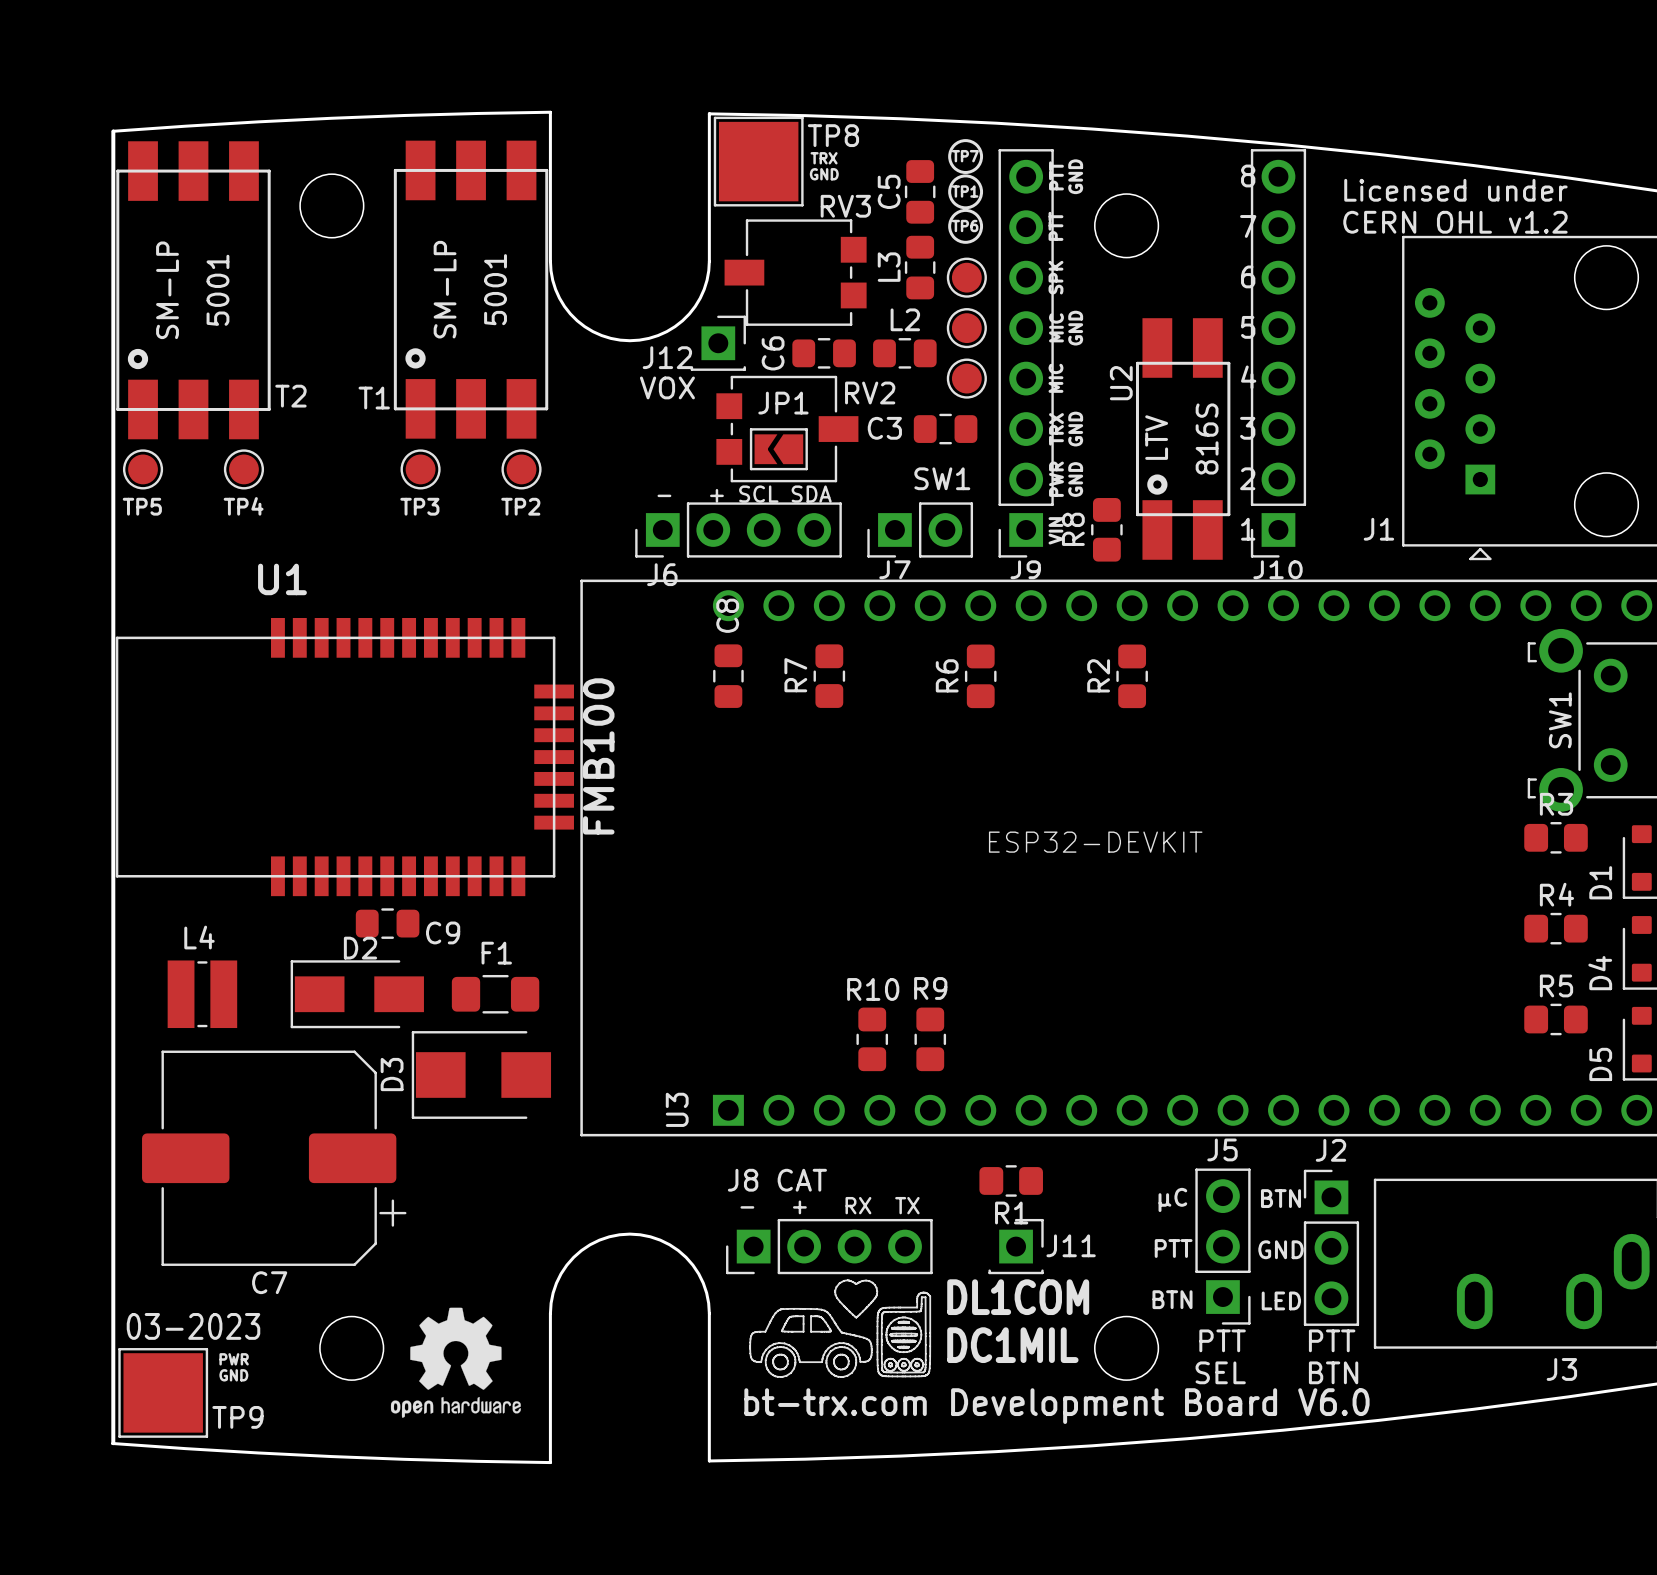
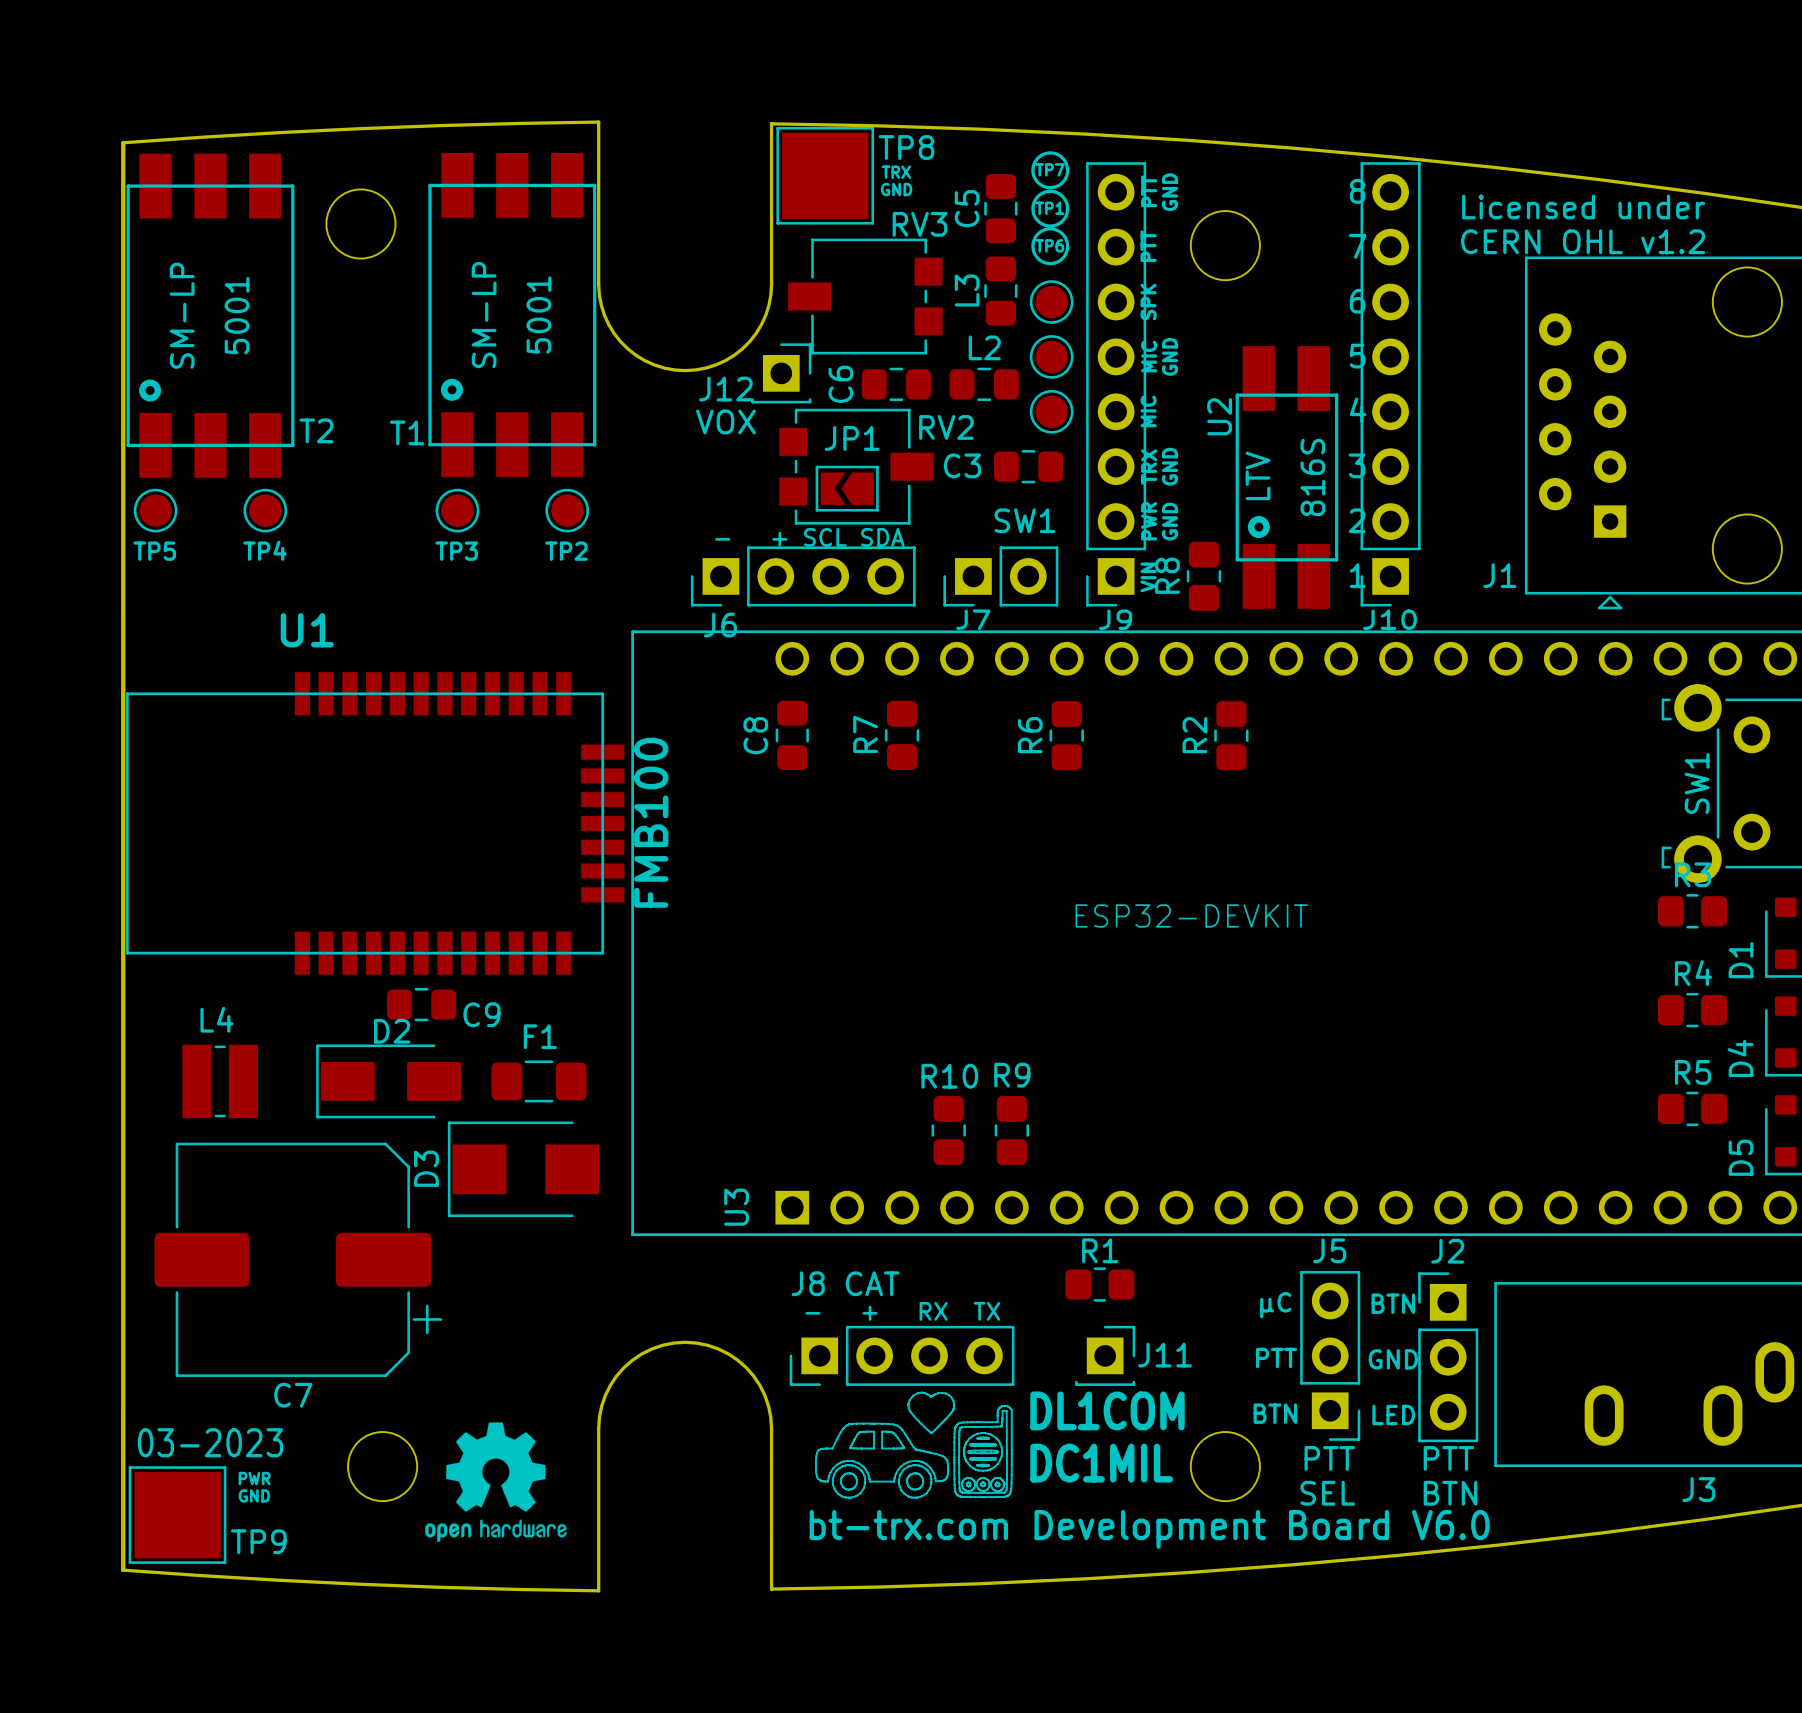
C8 name position: C8 (727, 615) -> C8 (755, 735)
R1 name position: R1 (1011, 1213) -> R1 (1100, 1250)

